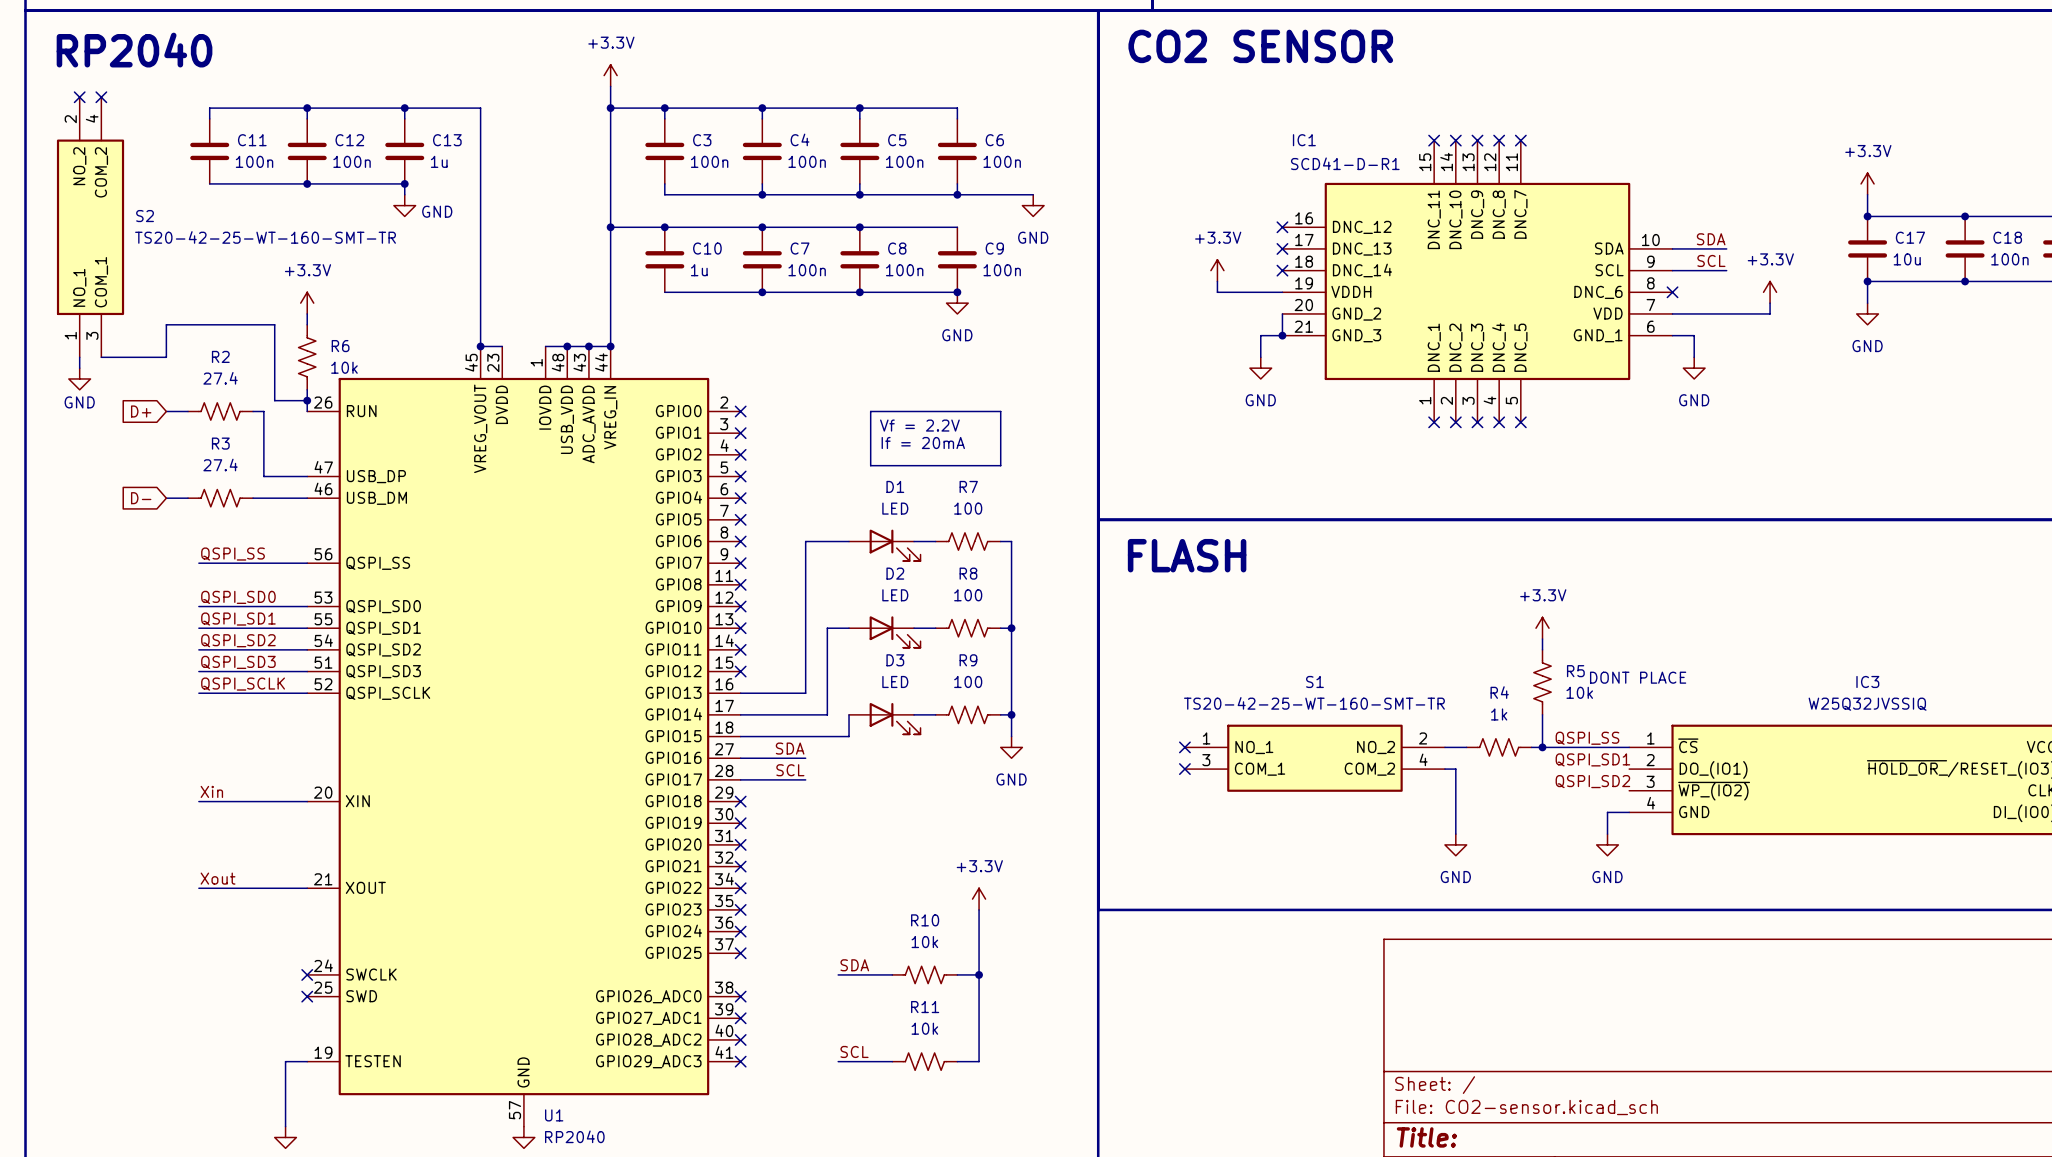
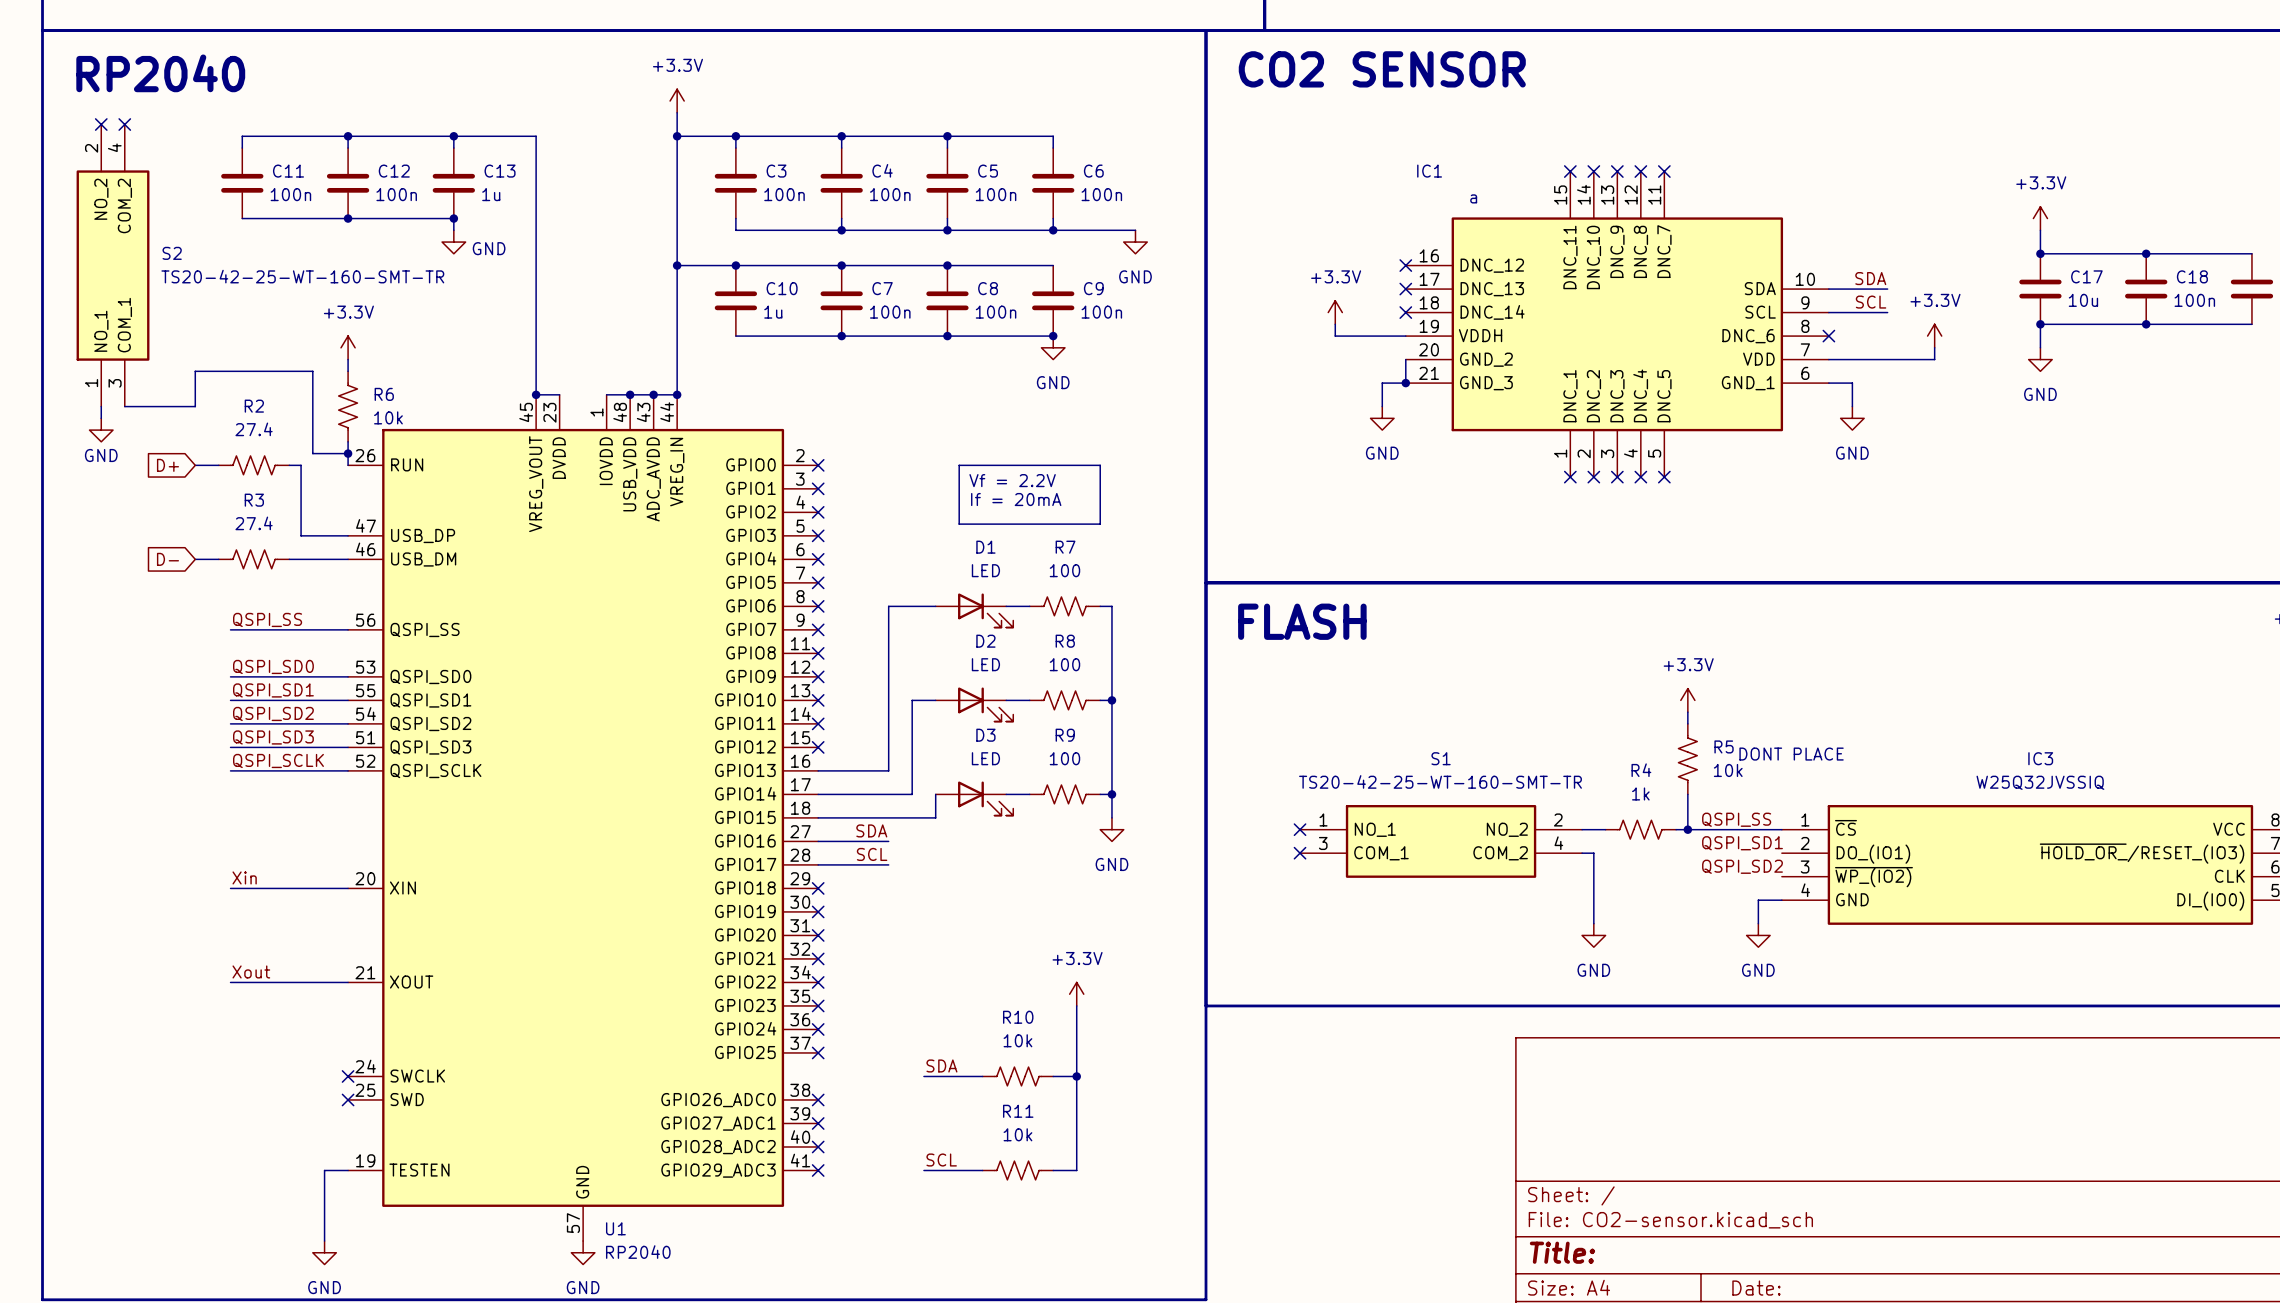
IC1 value: SCD41-D-R1 (1345, 163) -> a (1473, 198)

